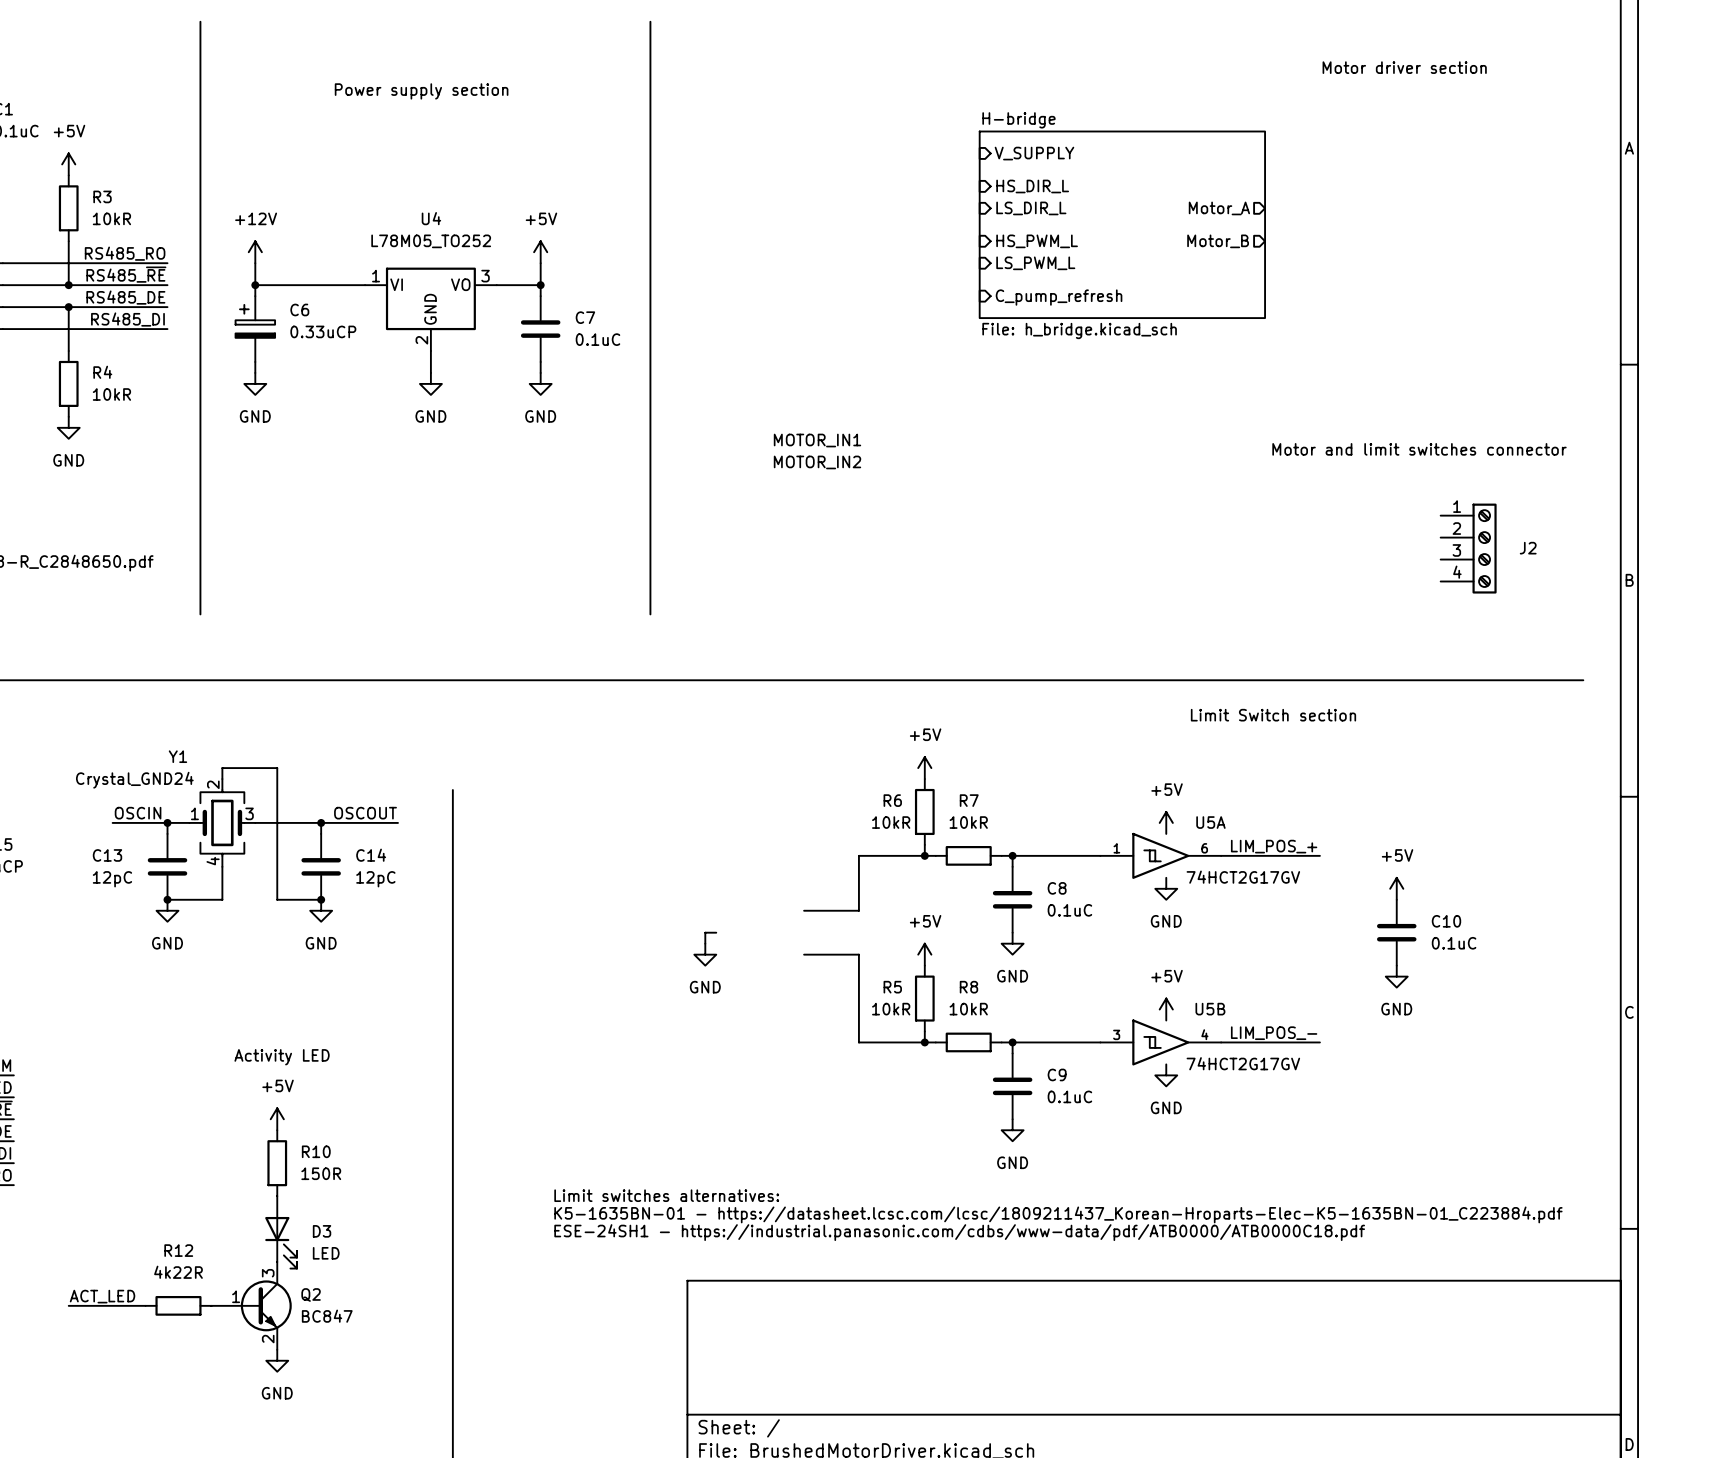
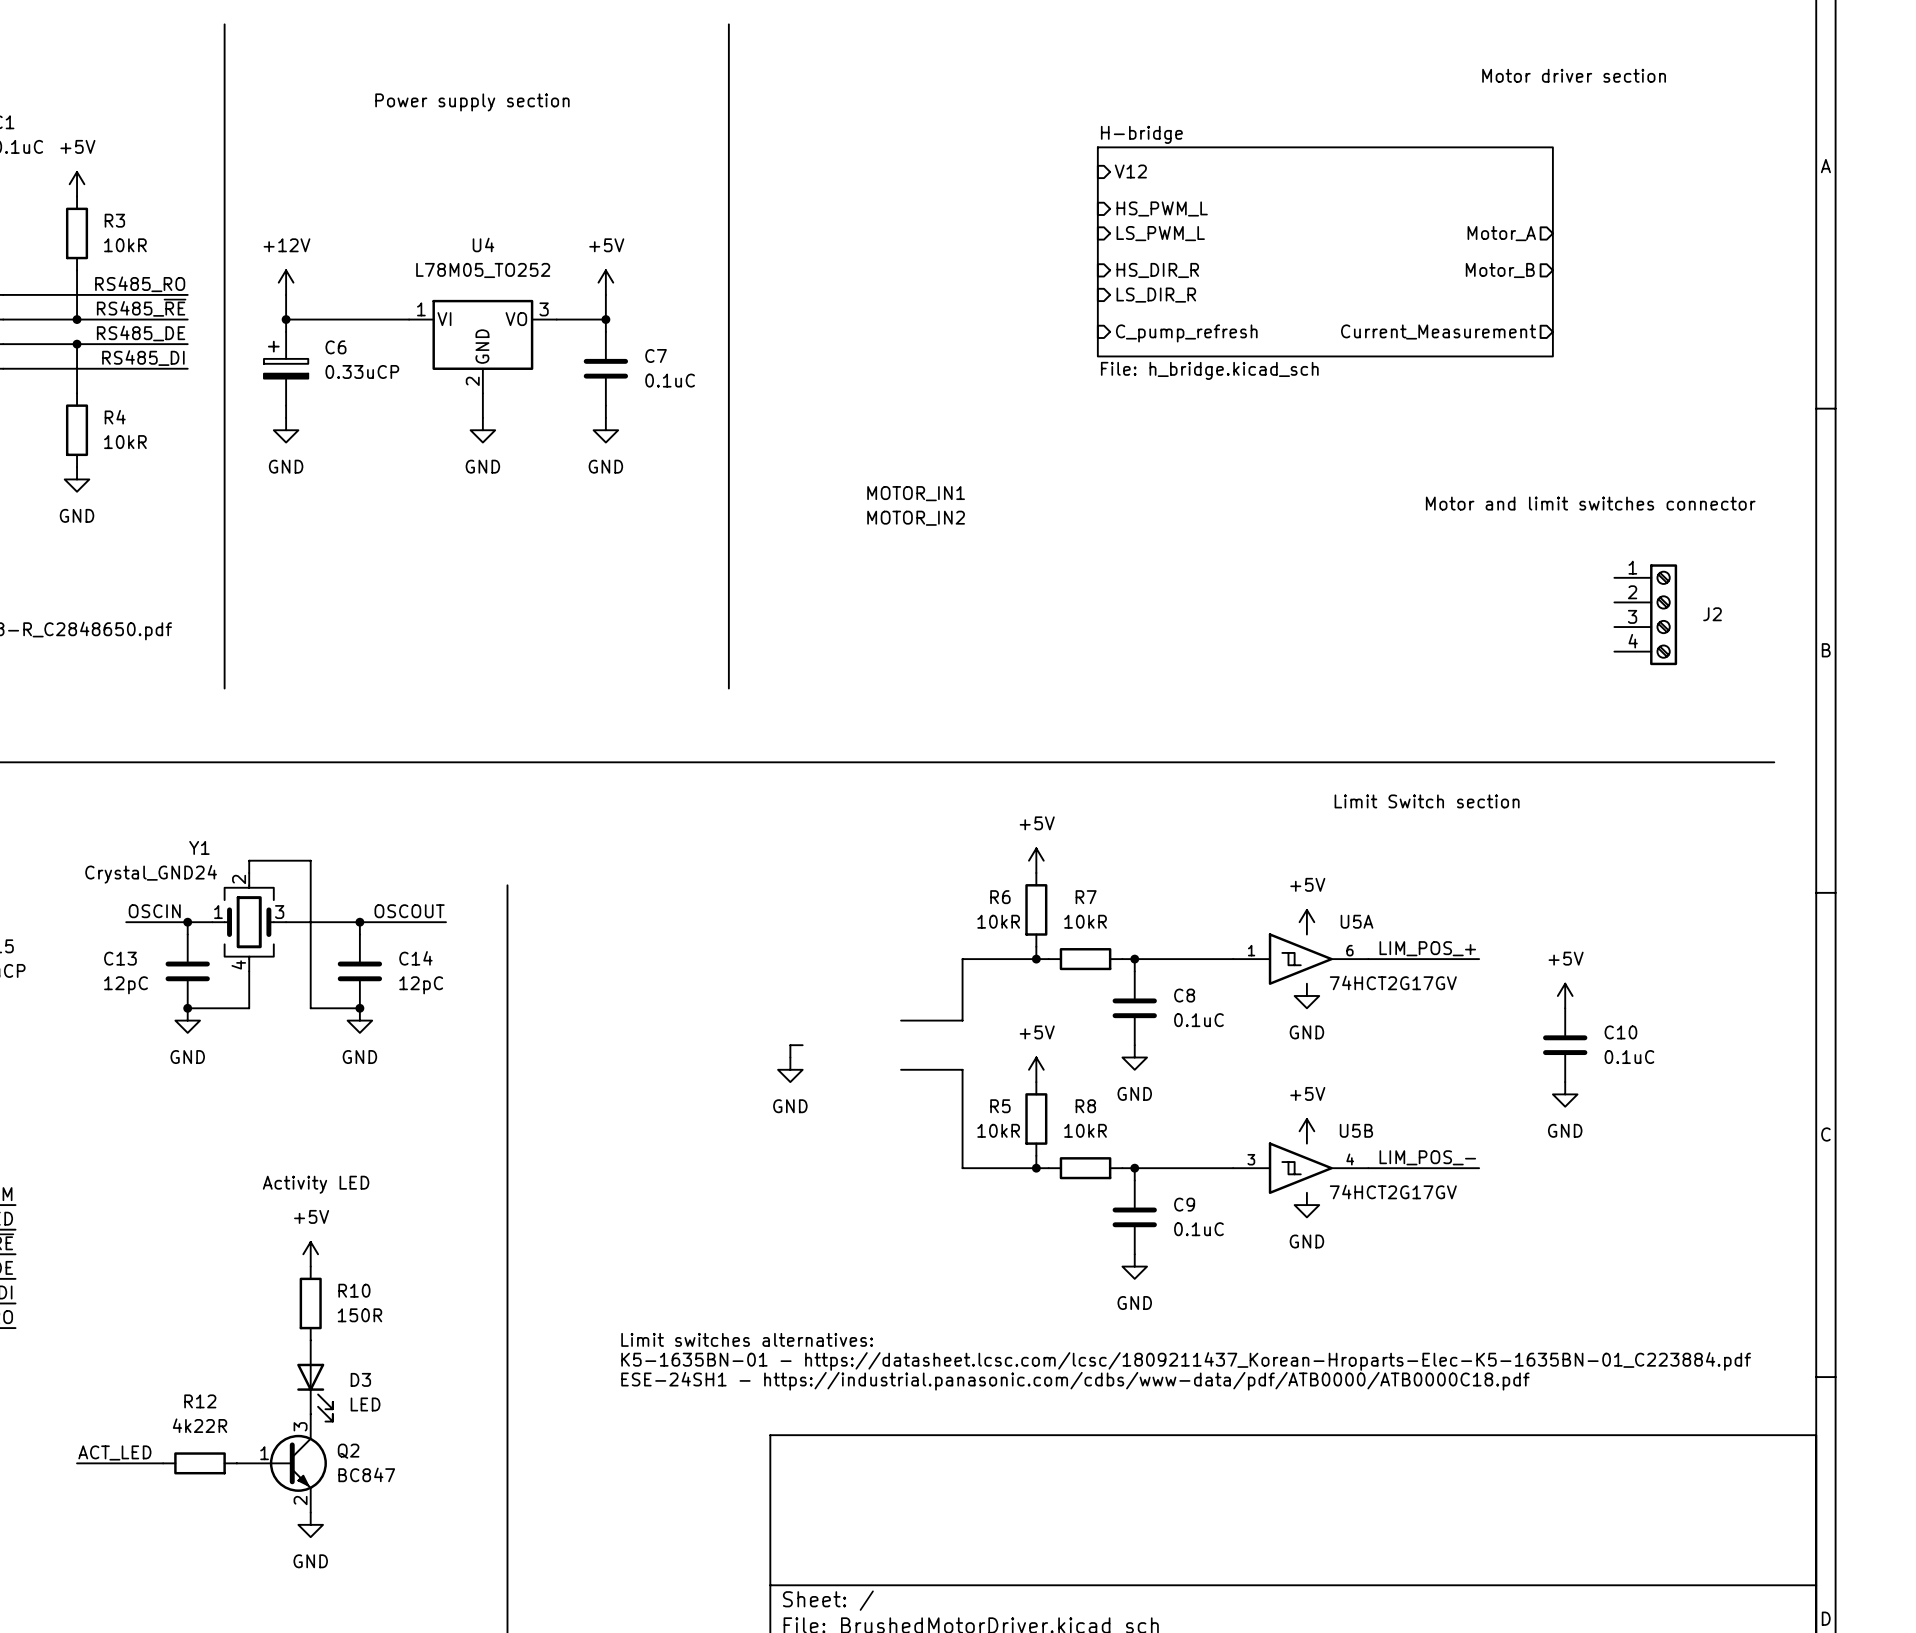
sheet pin: V_SUPPLY (1034, 153) -> V12 (1130, 171)
sheet pin: HS_DIR_L (1032, 186) -> HS_PWM_L (1162, 208)
sheet pin: LS_DIR_L (1031, 208) -> LS_PWM_L (1160, 233)
sheet pin position: Motor_A (1219, 208) -> Motor_A (1501, 233)
sheet H-bridge: File: h_bridge.kicad_sch (1122, 224) -> none
sheet H-bridge: none -> File: h_bridge.kicad_sch (1325, 251)
sheet pin: HS_PWM_L (1037, 241) -> HS_DIR_R (1157, 270)
sheet pin position: Motor_B (1218, 241) -> Motor_B (1500, 270)
sheet pin: LS_PWM_L (1035, 263) -> LS_DIR_R (1156, 295)
sheet pin: none -> Current_Measurement (1438, 331)

